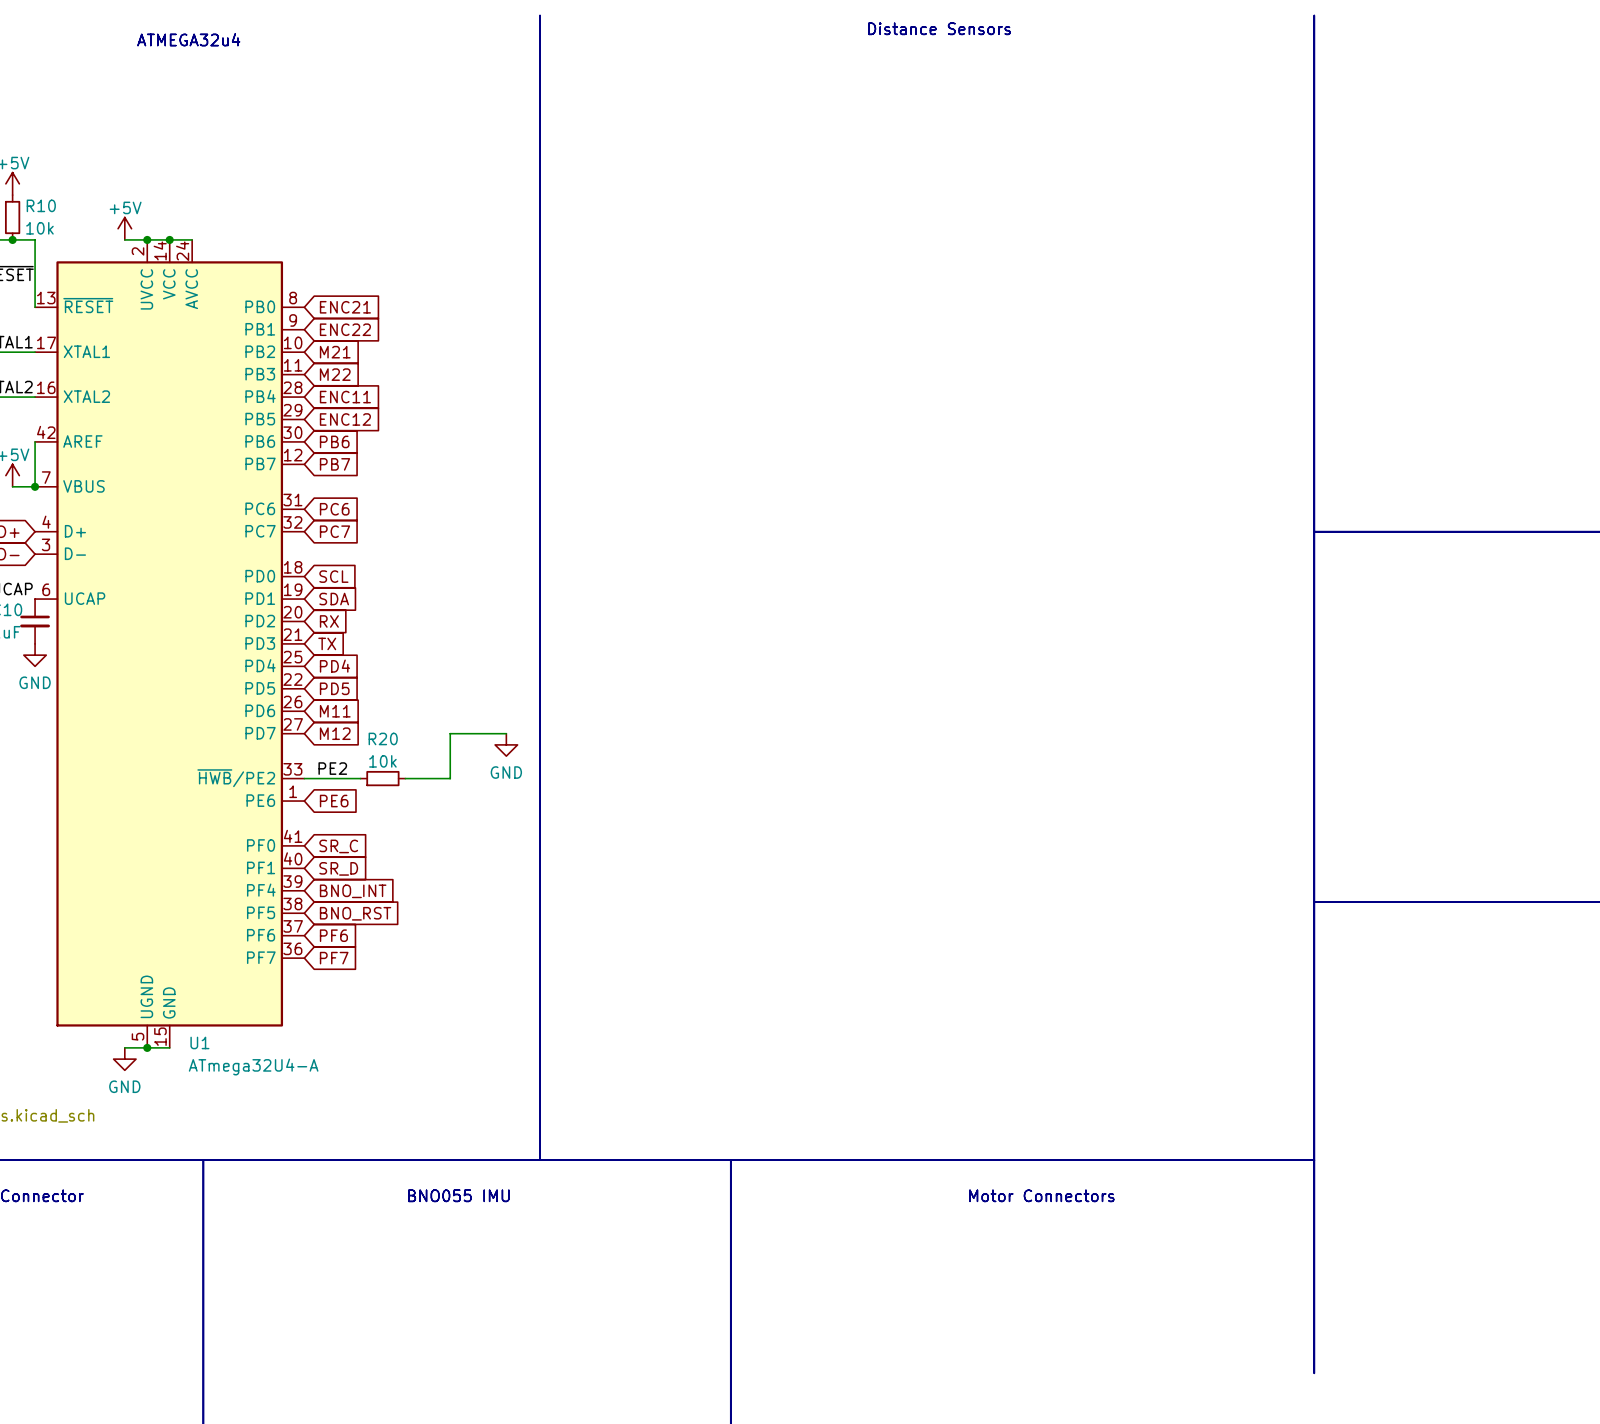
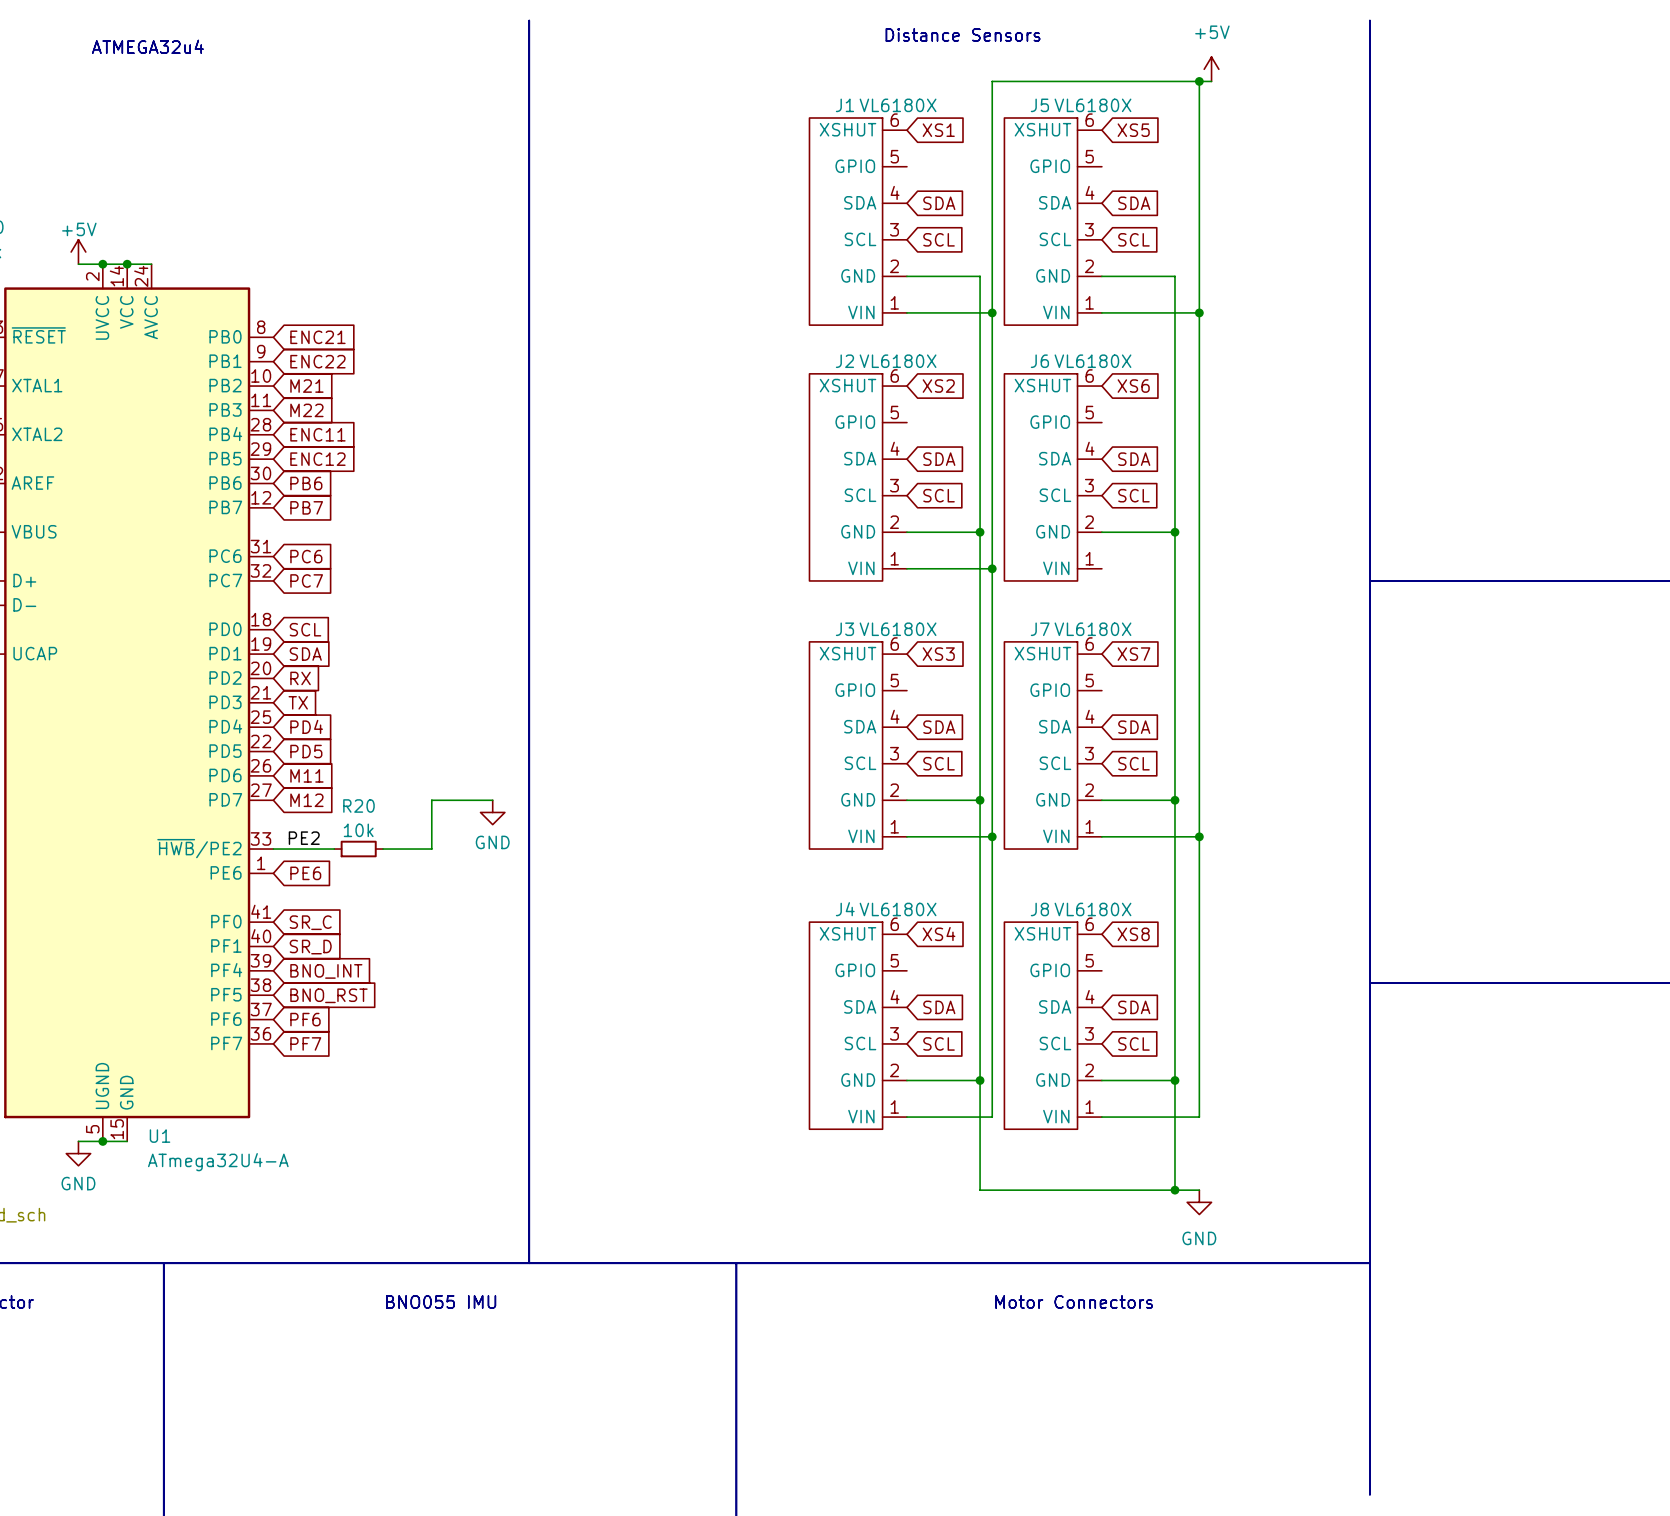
power symbol: none -> +5V (1211, 69)
wire: none -> (1199, 81) (1199, 1117) (1101, 1117)
junction: none -> (1199, 81)
wire: none -> (1211, 81) (992, 81) (992, 1117) (906, 1117)
global label: none -> XS1 (938, 130)
global label: none -> XS5 (1133, 130)
global label: none -> SDA (939, 203)
global label: none -> SDA (1134, 203)
J1: none -> VL6180X (857, 221)
J5: none -> VL6180X (1052, 221)
global label: none -> SCL (939, 239)
global label: none -> SCL (1133, 239)
wire: none -> (906, 276) (980, 276) (980, 1190) (1199, 1190)
wire: none -> (1101, 276) (1174, 276) (1174, 1190)
wire: none -> (906, 312) (992, 312)
junction: none -> (992, 312)
wire: none -> (1101, 312) (1199, 312)
junction: none -> (1199, 312)
global label: none -> XS2 (938, 386)
global label: none -> XS6 (1133, 386)
global label: none -> SDA (939, 459)
global label: none -> SDA (1134, 459)
J2: none -> VL6180X (857, 477)
J6: none -> VL6180X (1052, 477)
global label: none -> SCL (939, 495)
global label: none -> SCL (1133, 495)
wire: none -> (906, 532) (980, 532)
junction: none -> (980, 532)
wire: none -> (1101, 532) (1174, 532)
junction: none -> (1174, 532)
wire: none -> (906, 568) (992, 568)
junction: none -> (992, 568)
global label: none -> XS3 (938, 654)
global label: none -> XS7 (1133, 654)
global label: none -> SDA (939, 727)
global label: none -> SDA (1134, 727)
J3: none -> VL6180X (857, 745)
J7: none -> VL6180X (1052, 745)
global label: none -> SCL (939, 763)
global label: none -> SCL (1133, 763)
wire: none -> (906, 800) (980, 800)
junction: none -> (980, 800)
wire: none -> (1101, 800) (1174, 800)
junction: none -> (1174, 800)
wire: none -> (906, 836) (992, 836)
junction: none -> (992, 836)
wire: none -> (1101, 836) (1199, 836)
junction: none -> (1199, 836)
global label: none -> XS4 (939, 934)
global label: none -> XS8 (1133, 934)
global label: none -> SDA (939, 1007)
global label: none -> SDA (1134, 1007)
J4: none -> VL6180X (857, 1025)
J8: none -> VL6180X (1052, 1025)
global label: none -> SCL (939, 1043)
global label: none -> SCL (1133, 1043)
wire: none -> (906, 1080) (980, 1080)
junction: none -> (980, 1080)
wire: none -> (1101, 1080) (1174, 1080)
junction: none -> (1174, 1080)
junction: none -> (1174, 1190)
power symbol: none -> GND (1199, 1202)

